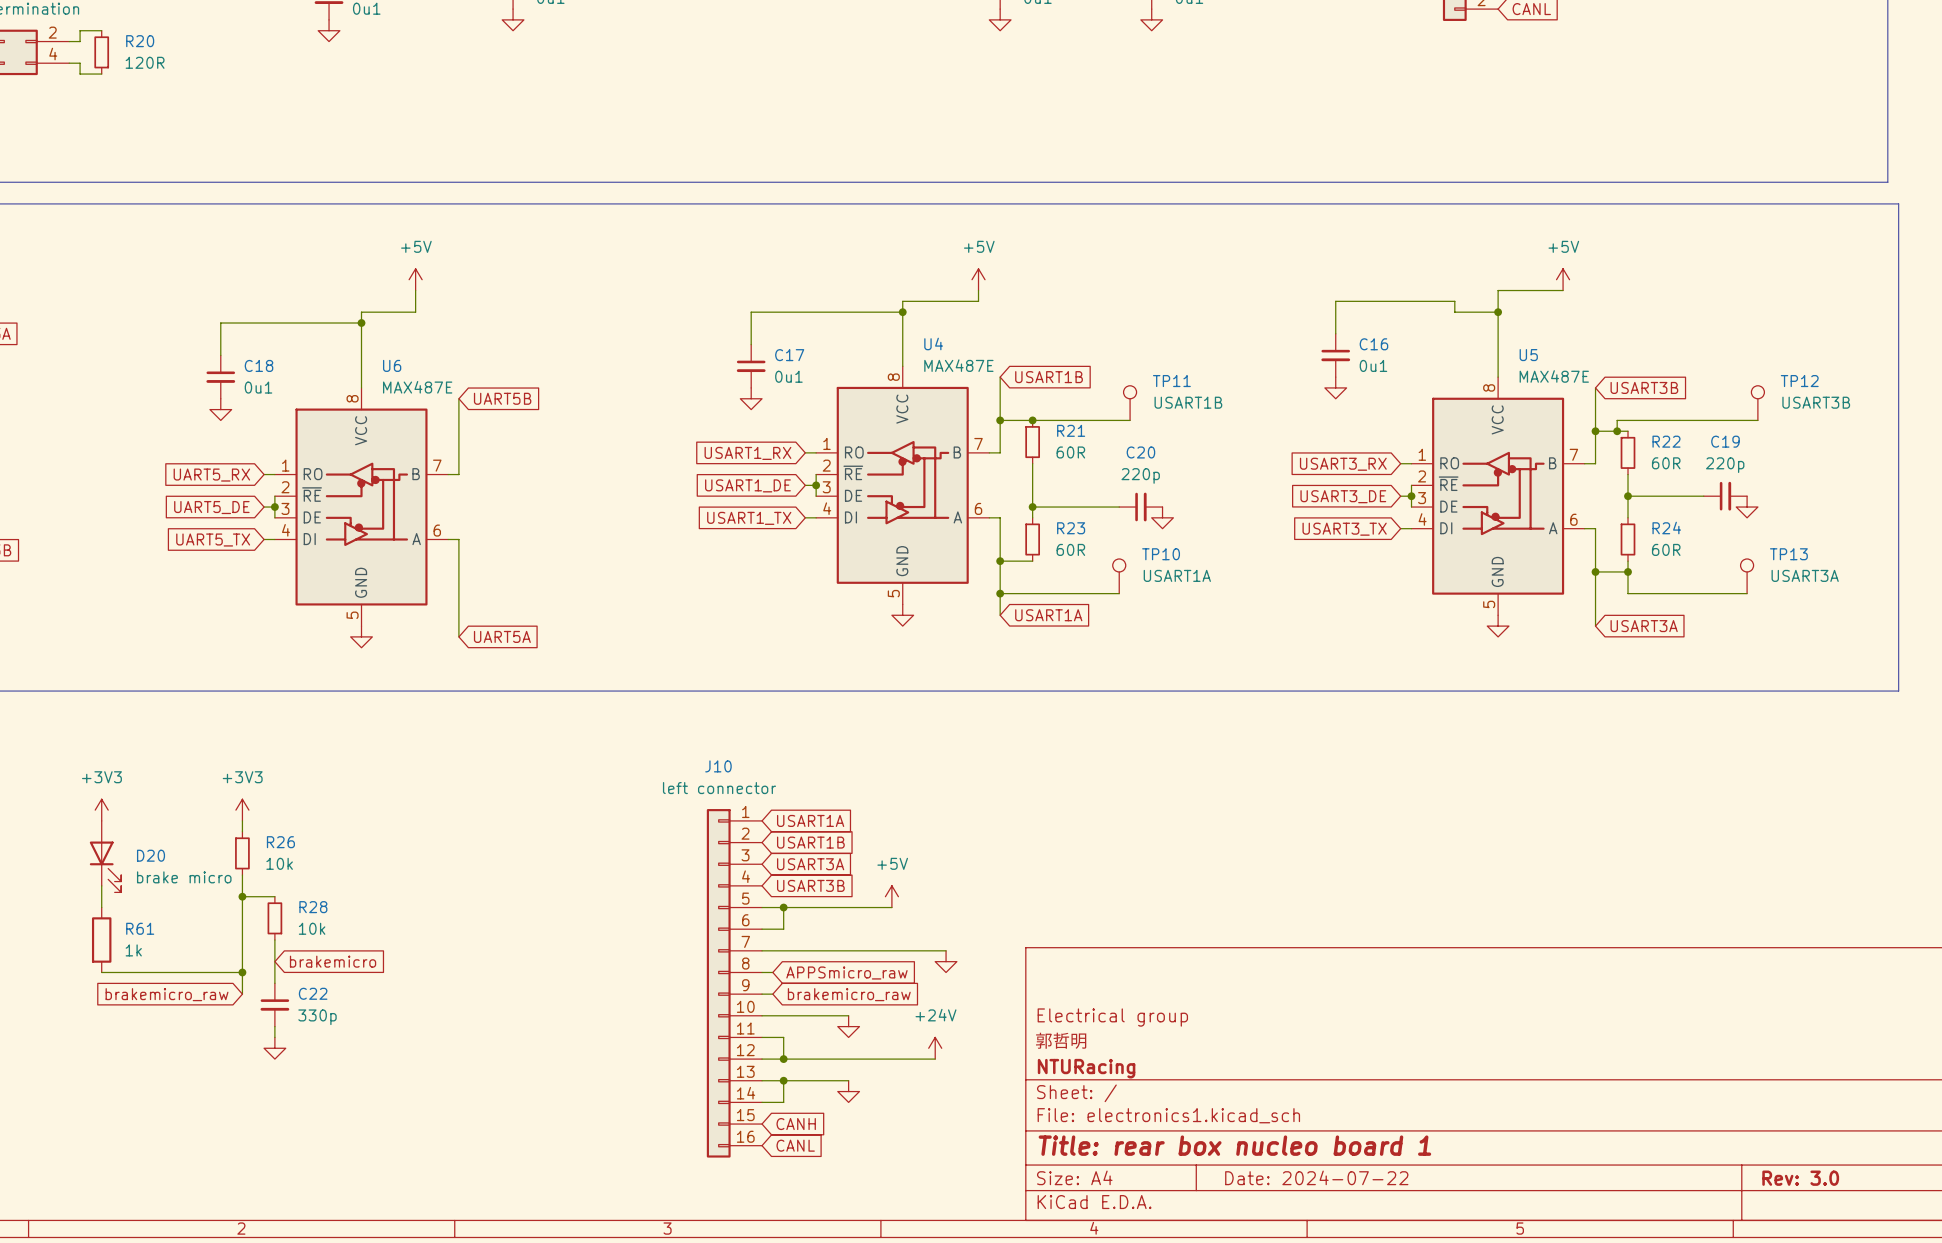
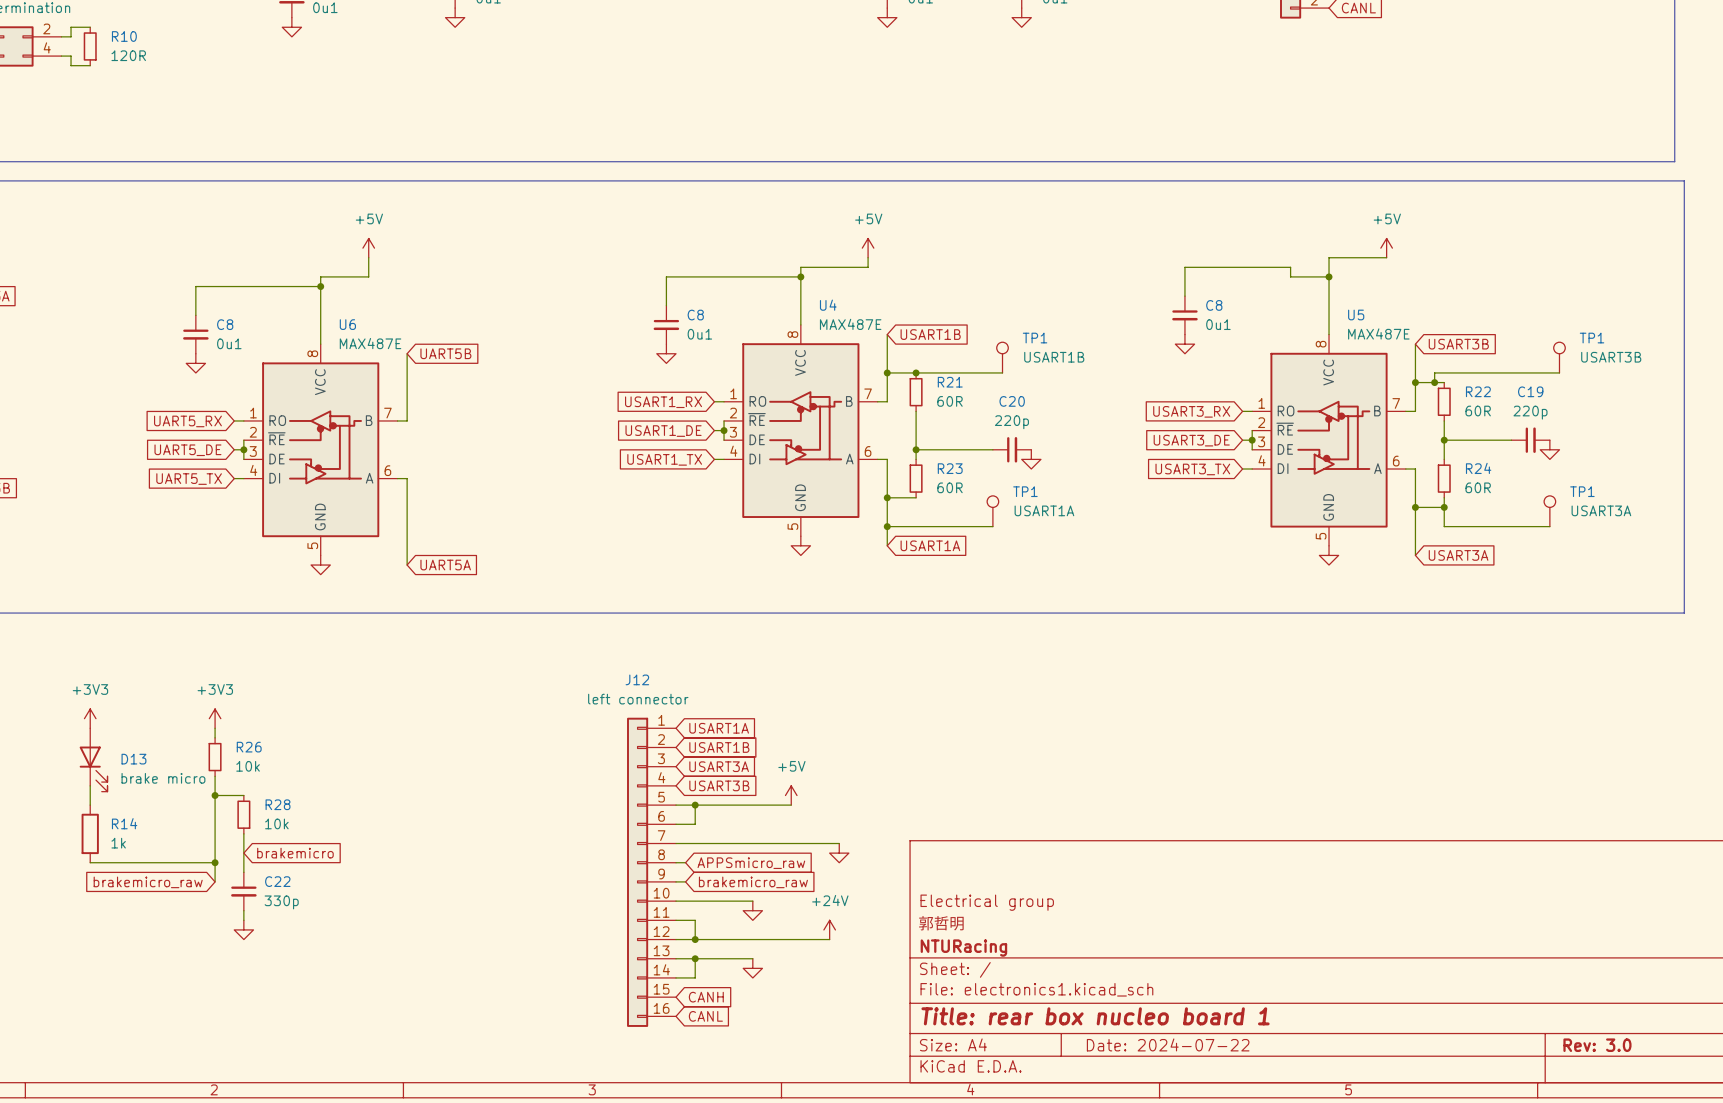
R20 name: R20 (140, 41) -> R10 (124, 36)
C16 name: C16 (1373, 344) -> C8 (1214, 305)
C17 name: C17 (789, 355) -> C8 (695, 315)
C18 name: C18 (259, 365) -> C8 (225, 324)
TP11 name: TP11 (1171, 381) -> TP1 (1035, 338)
TP12 name: TP12 (1799, 381) -> TP1 (1592, 338)
TP10 name: TP10 (1161, 554) -> TP1 (1025, 491)
TP13 name: TP13 (1788, 554) -> TP1 (1582, 491)
J10 name: J10 (718, 766) -> J12 (637, 679)
D20 name: D20 (151, 855) -> D13 (133, 759)
R61 name: R61 (140, 928) -> R14 (124, 823)

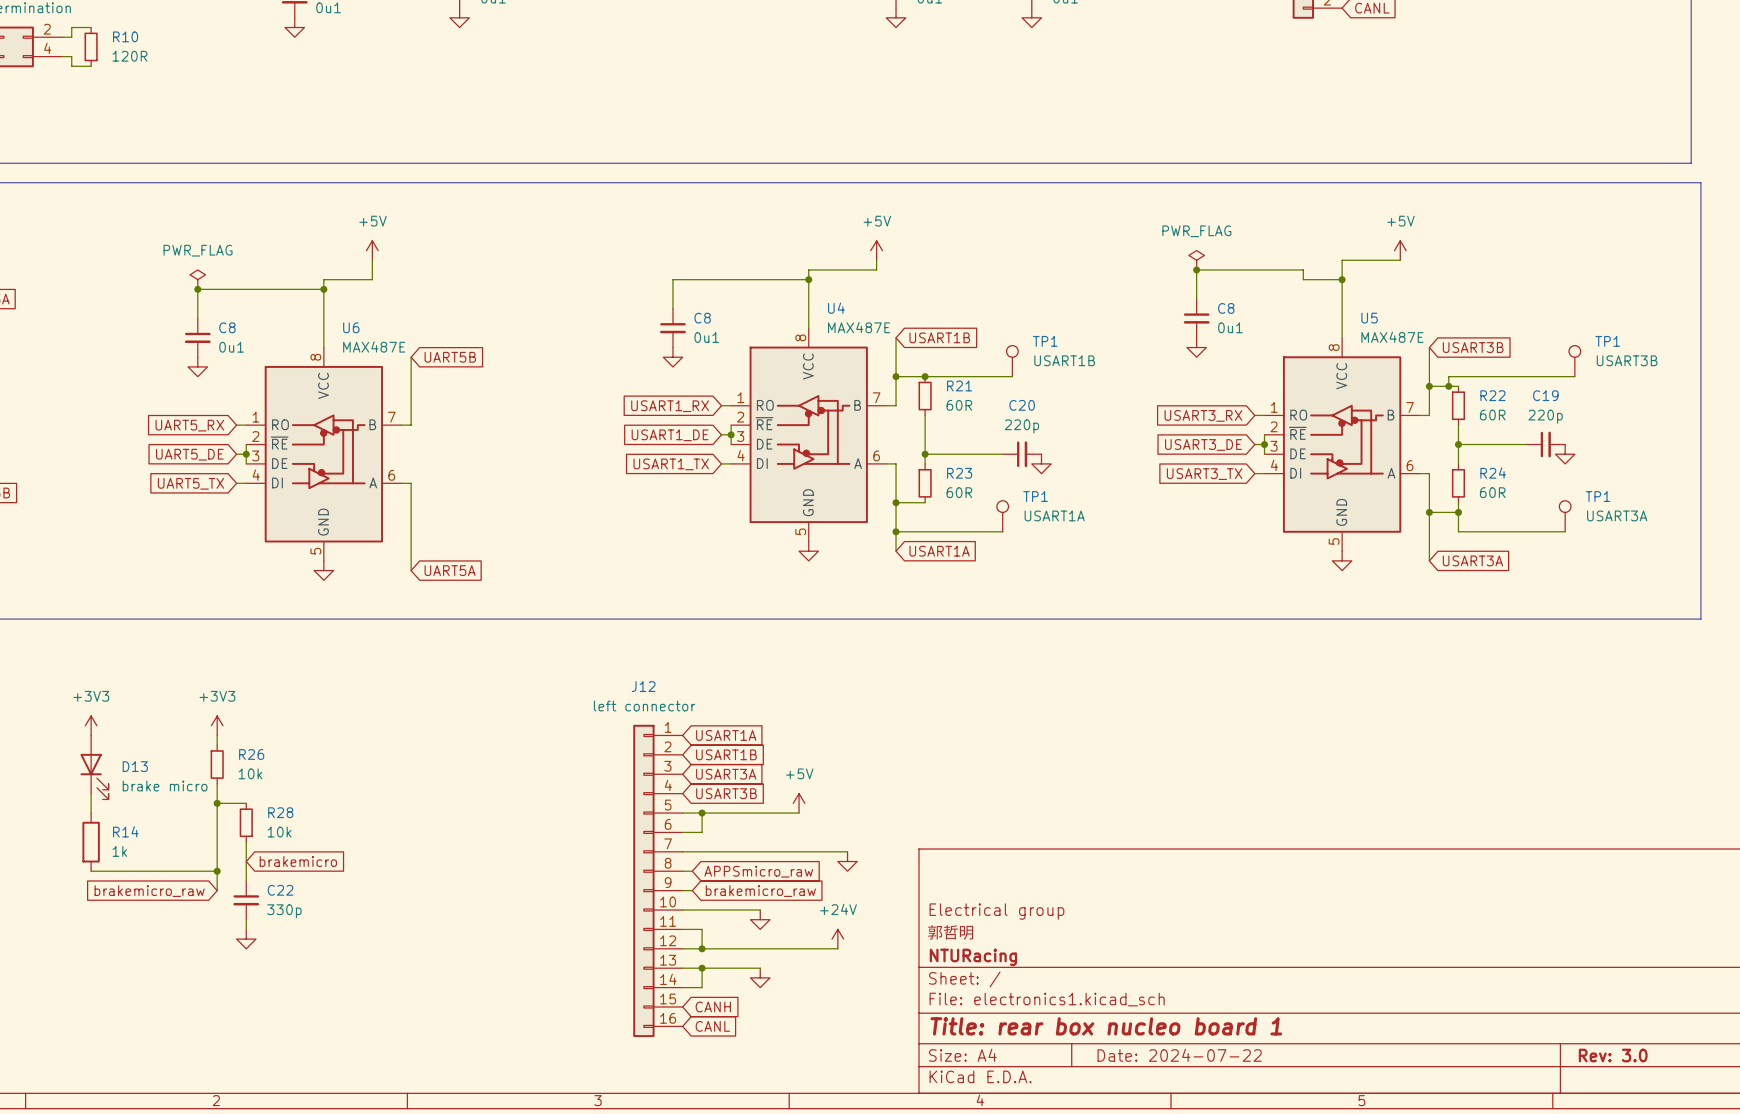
power symbol: none -> PWR_FLAG (1196, 260)
junction: none -> (1196, 269)
power symbol: none -> PWR_FLAG (197, 279)
junction: none -> (197, 289)

